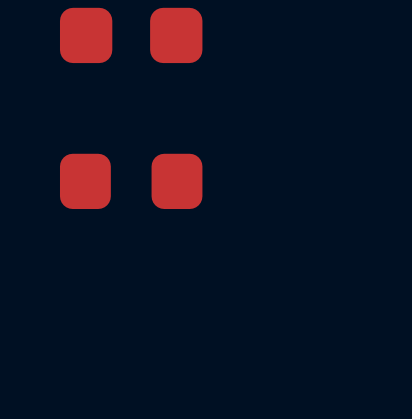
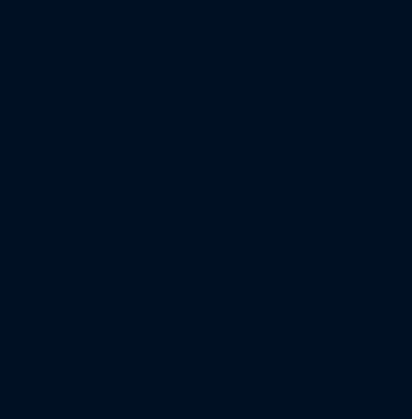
part: (131, 35) -> none
part: (131, 181) -> none

